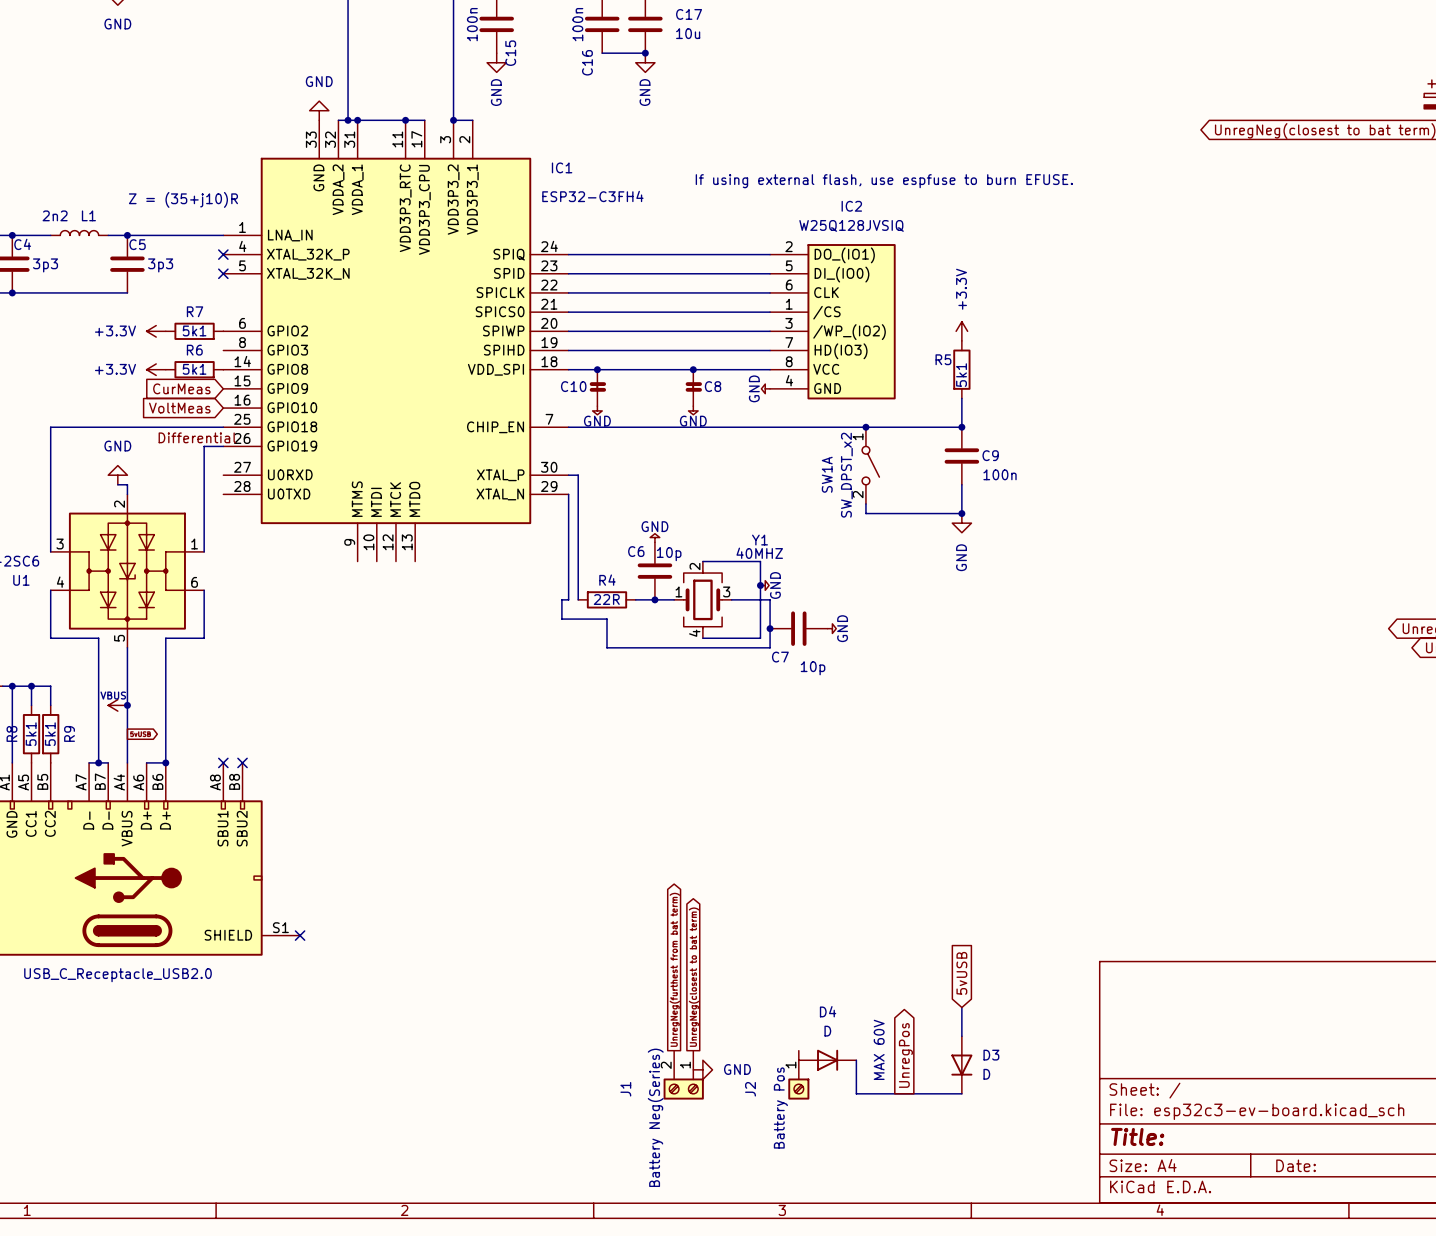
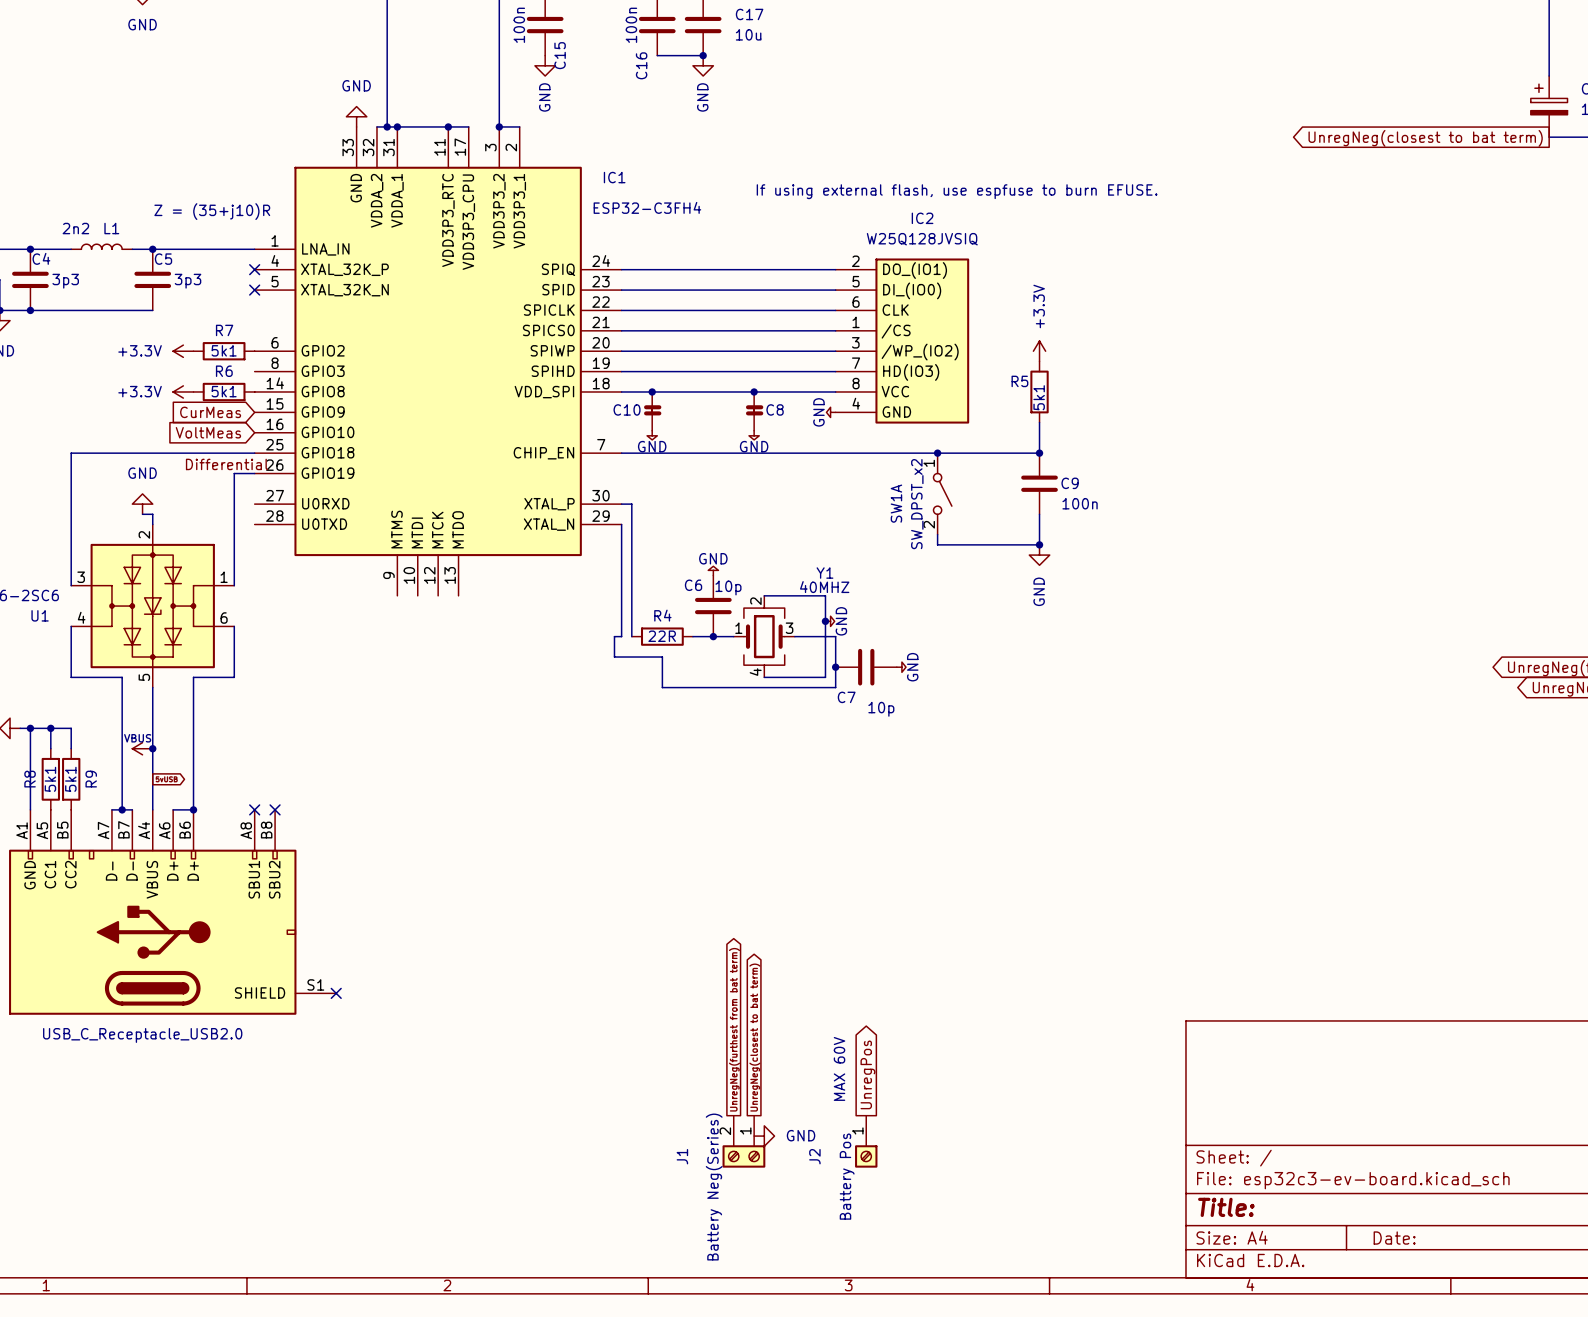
global label: 5vUSB (961, 973) -> none
wire: (961, 1007) (961, 1036) -> none
text position: MAX 60V (879, 1049) -> MAX 60V (839, 1068)
global label position: UnregPos (905, 1055) -> UnregPos (867, 1074)
D4: D (827, 1060) -> none
wire: (856, 1060) (856, 1093) (961, 1093) -> none
D3: D (961, 1065) -> none

